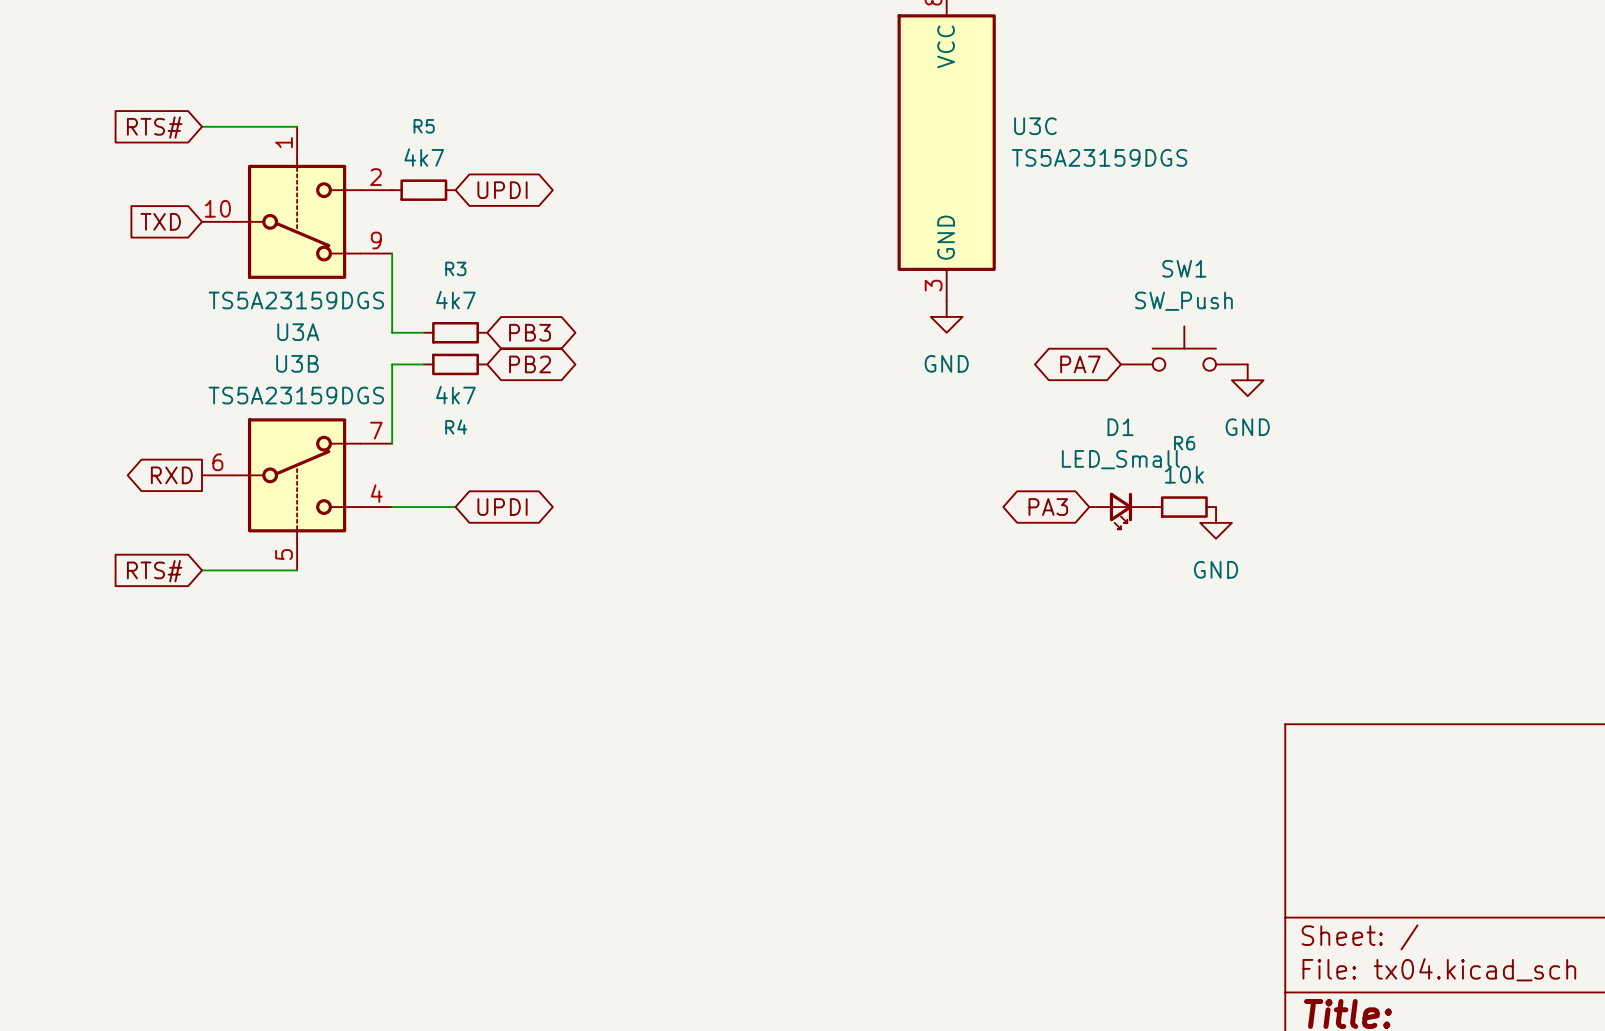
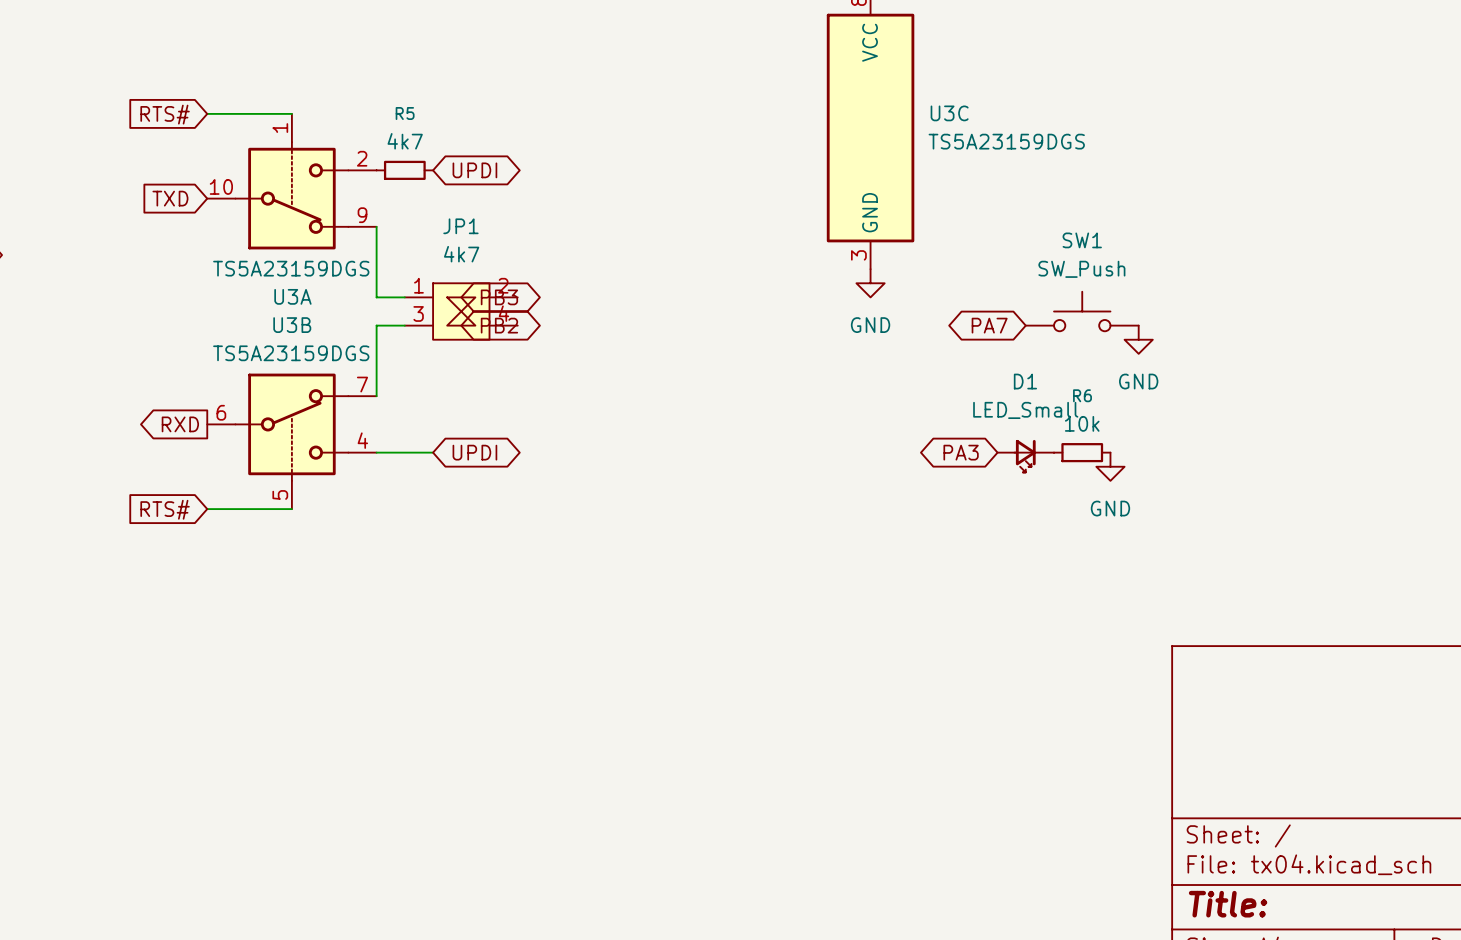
R3: 4k7 (455, 332) -> none
JP1: none -> 4k7 (461, 311)
R4: 4k7 (455, 364) -> none

